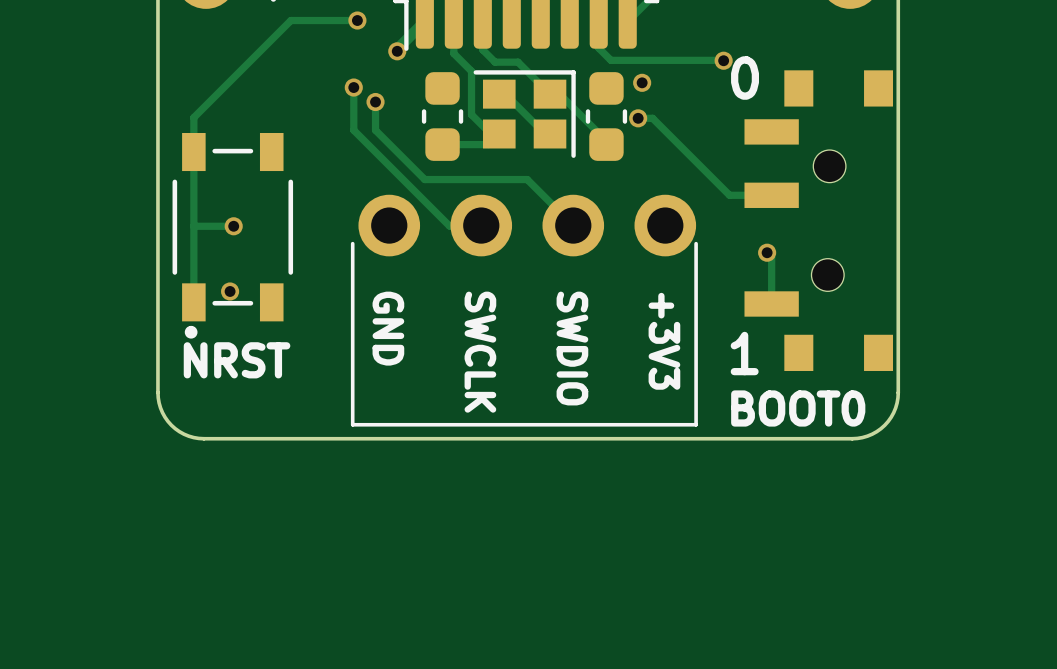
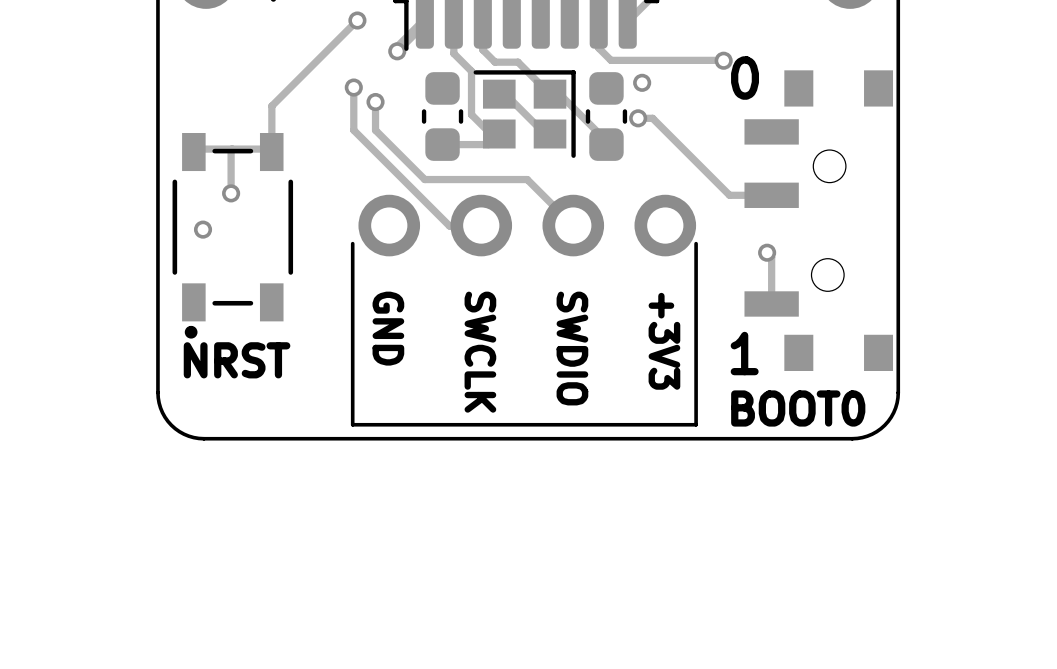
track: (357, 20) (290, 20) (193, 117) (193, 302) -> (357, 20) (271, 106) (271, 149) (193, 149)
track: none -> (232, 149) (231, 193)
via: none -> (231, 193)
track: (193, 226) (233, 226) -> none
via: (233, 226) -> none
via: none -> (203, 229)
via: (230, 291) -> none

